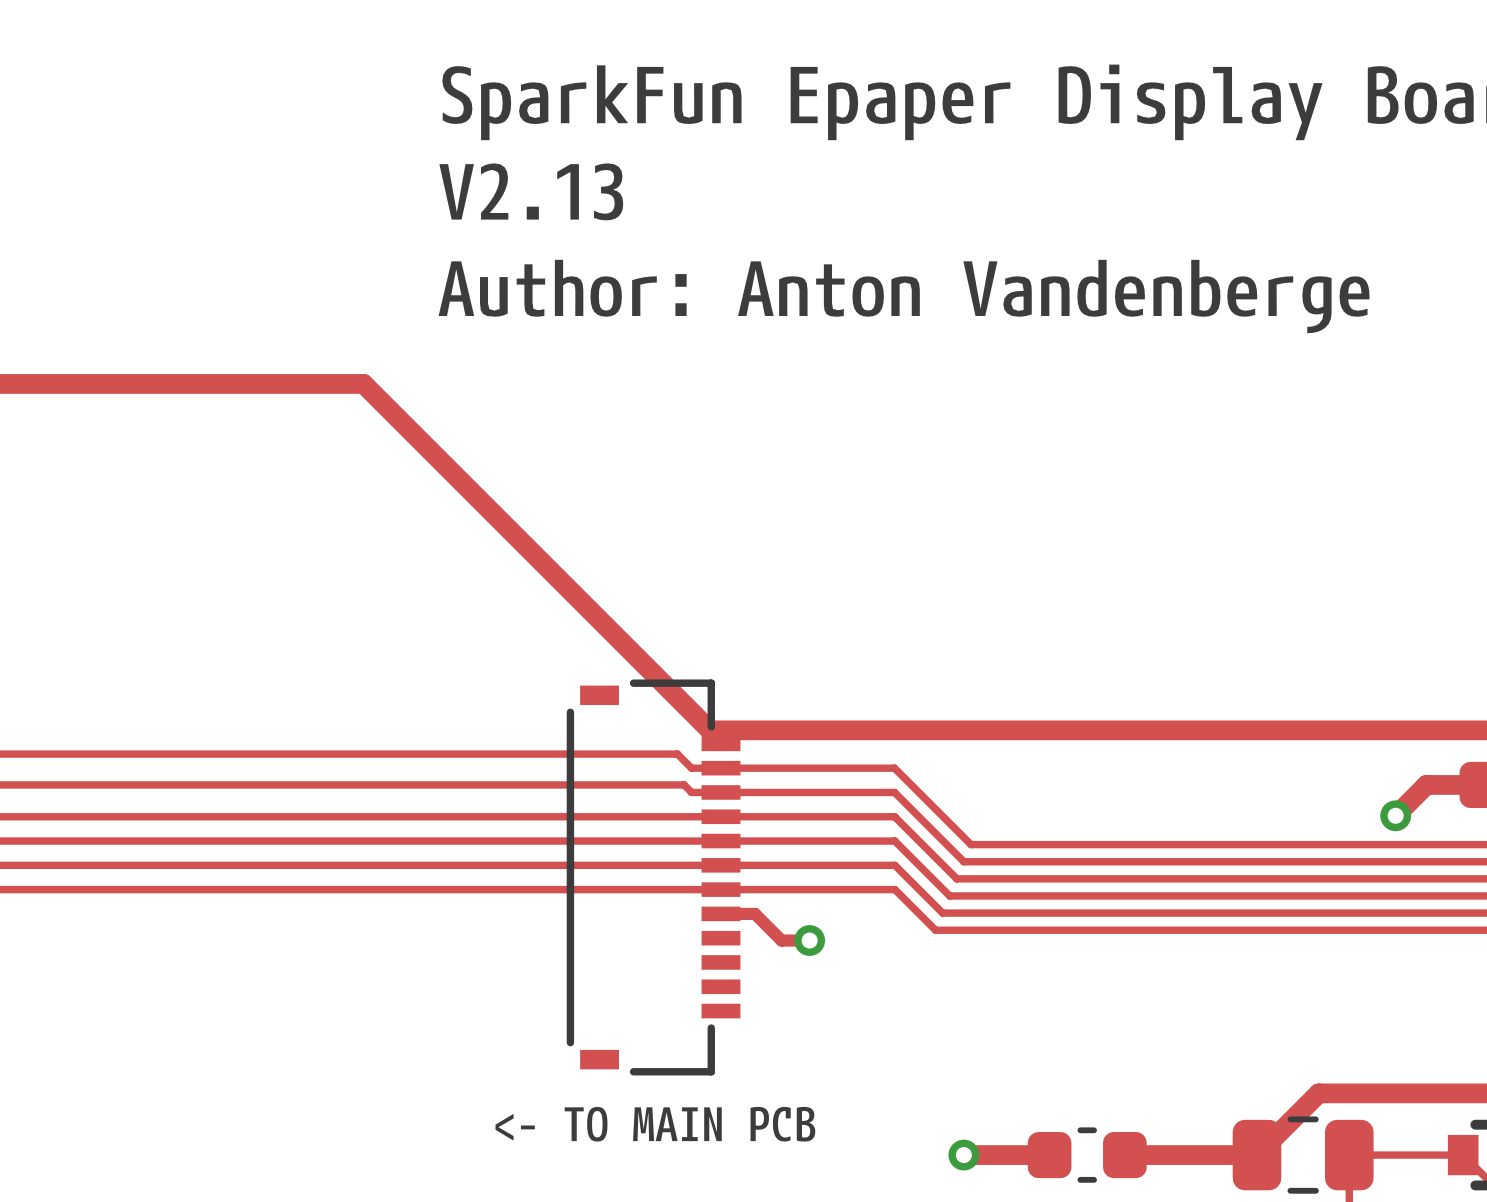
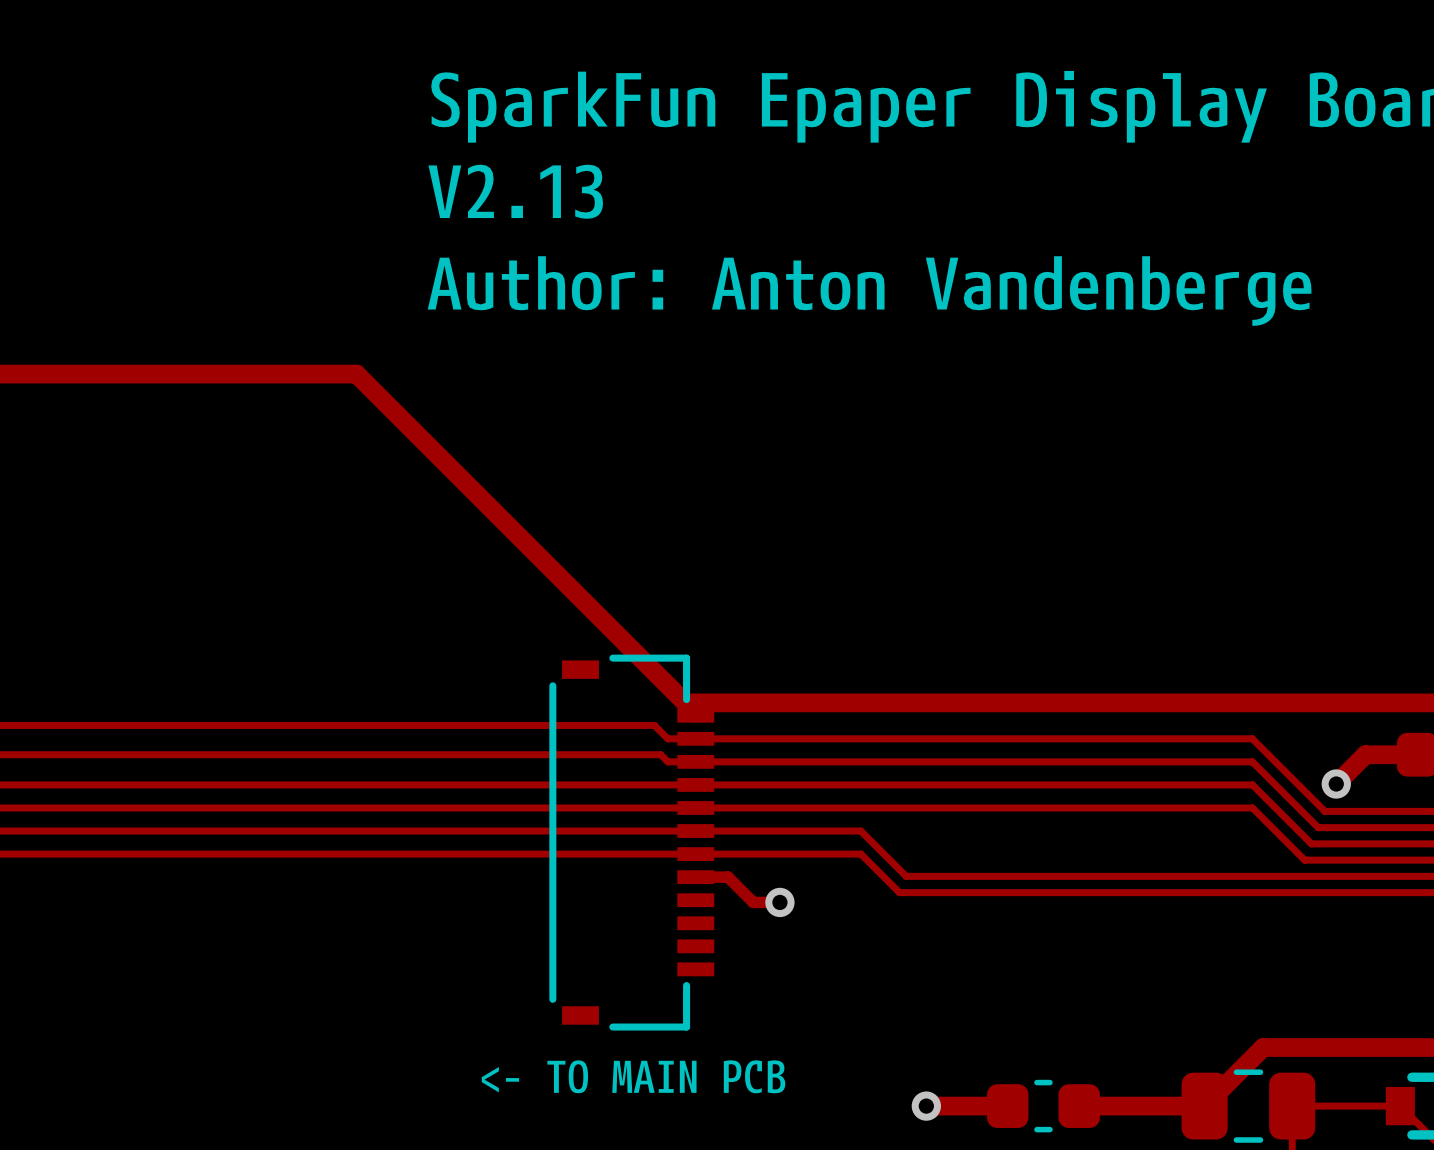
track: (894, 768) (971, 844) (1383, 844) -> (860, 738) (1252, 738) (1324, 811)
track: (894, 792) (963, 861) (1376, 861) -> (860, 761) (1252, 761) (1318, 827)
track: (894, 816) (956, 878) (1369, 878) -> (860, 784) (1252, 784) (1311, 843)
track: (894, 841) (949, 895) (1362, 895) -> (860, 807) (1252, 807) (1304, 860)

